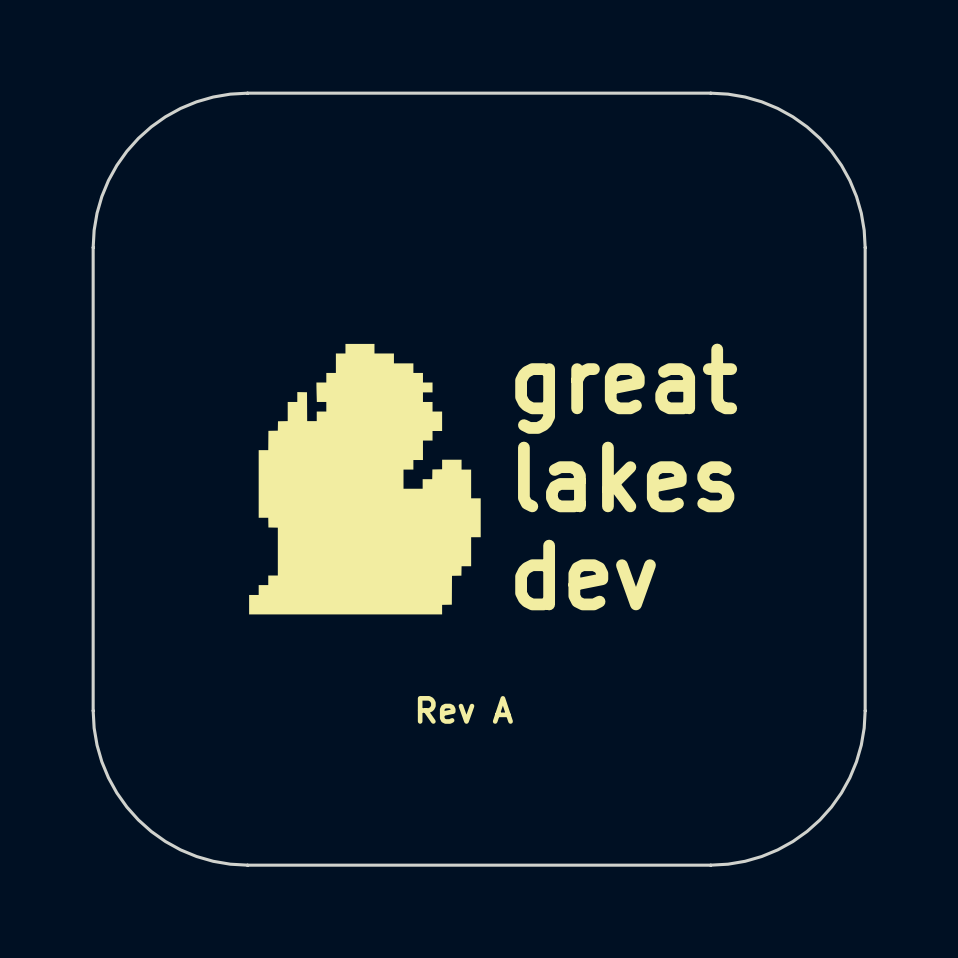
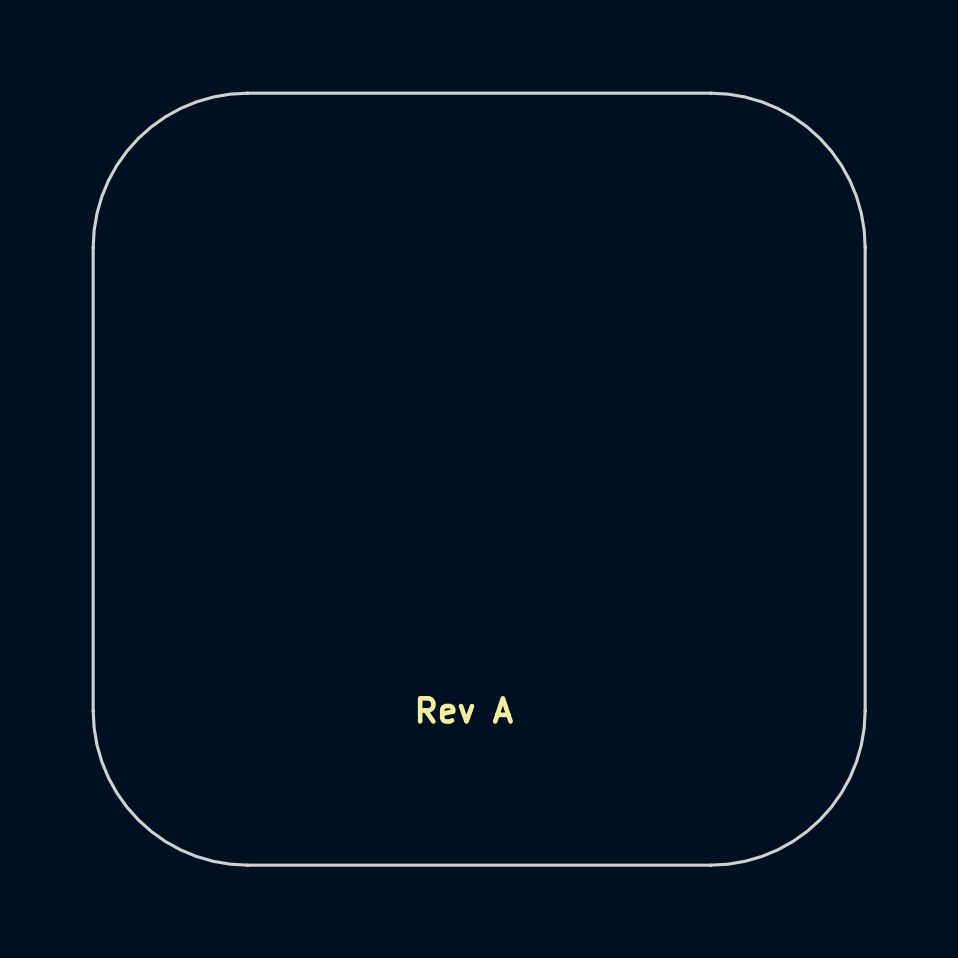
drawing: [249, 343, 481, 615] -> none

